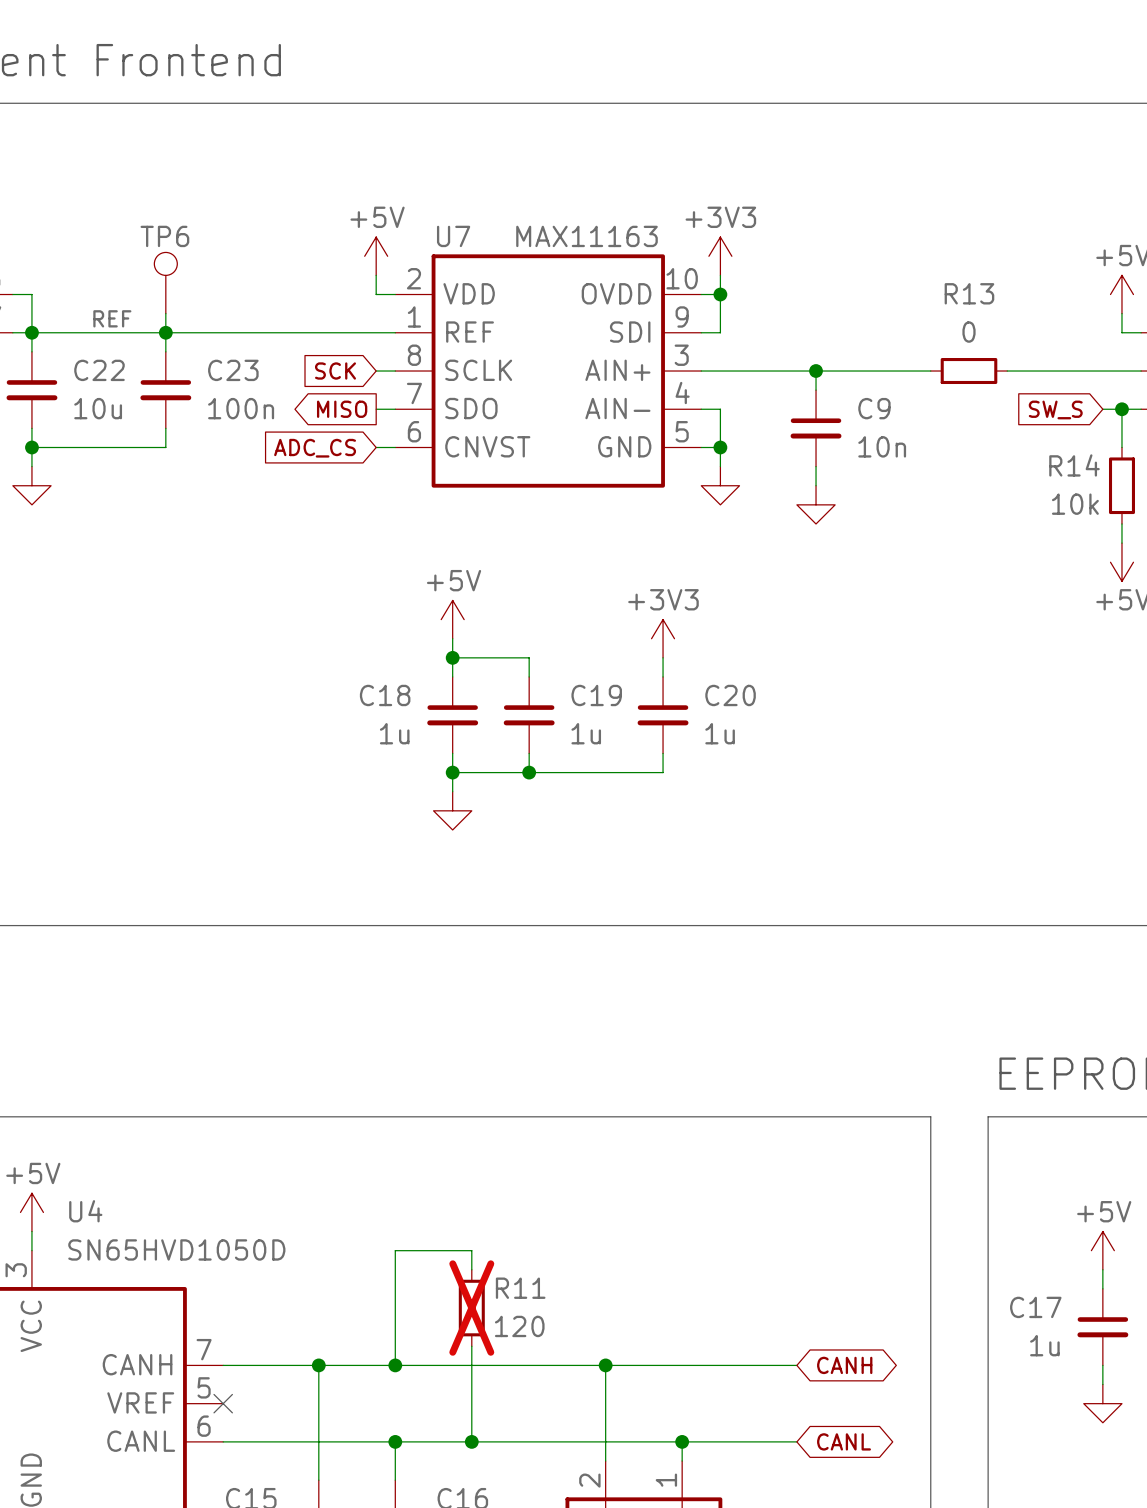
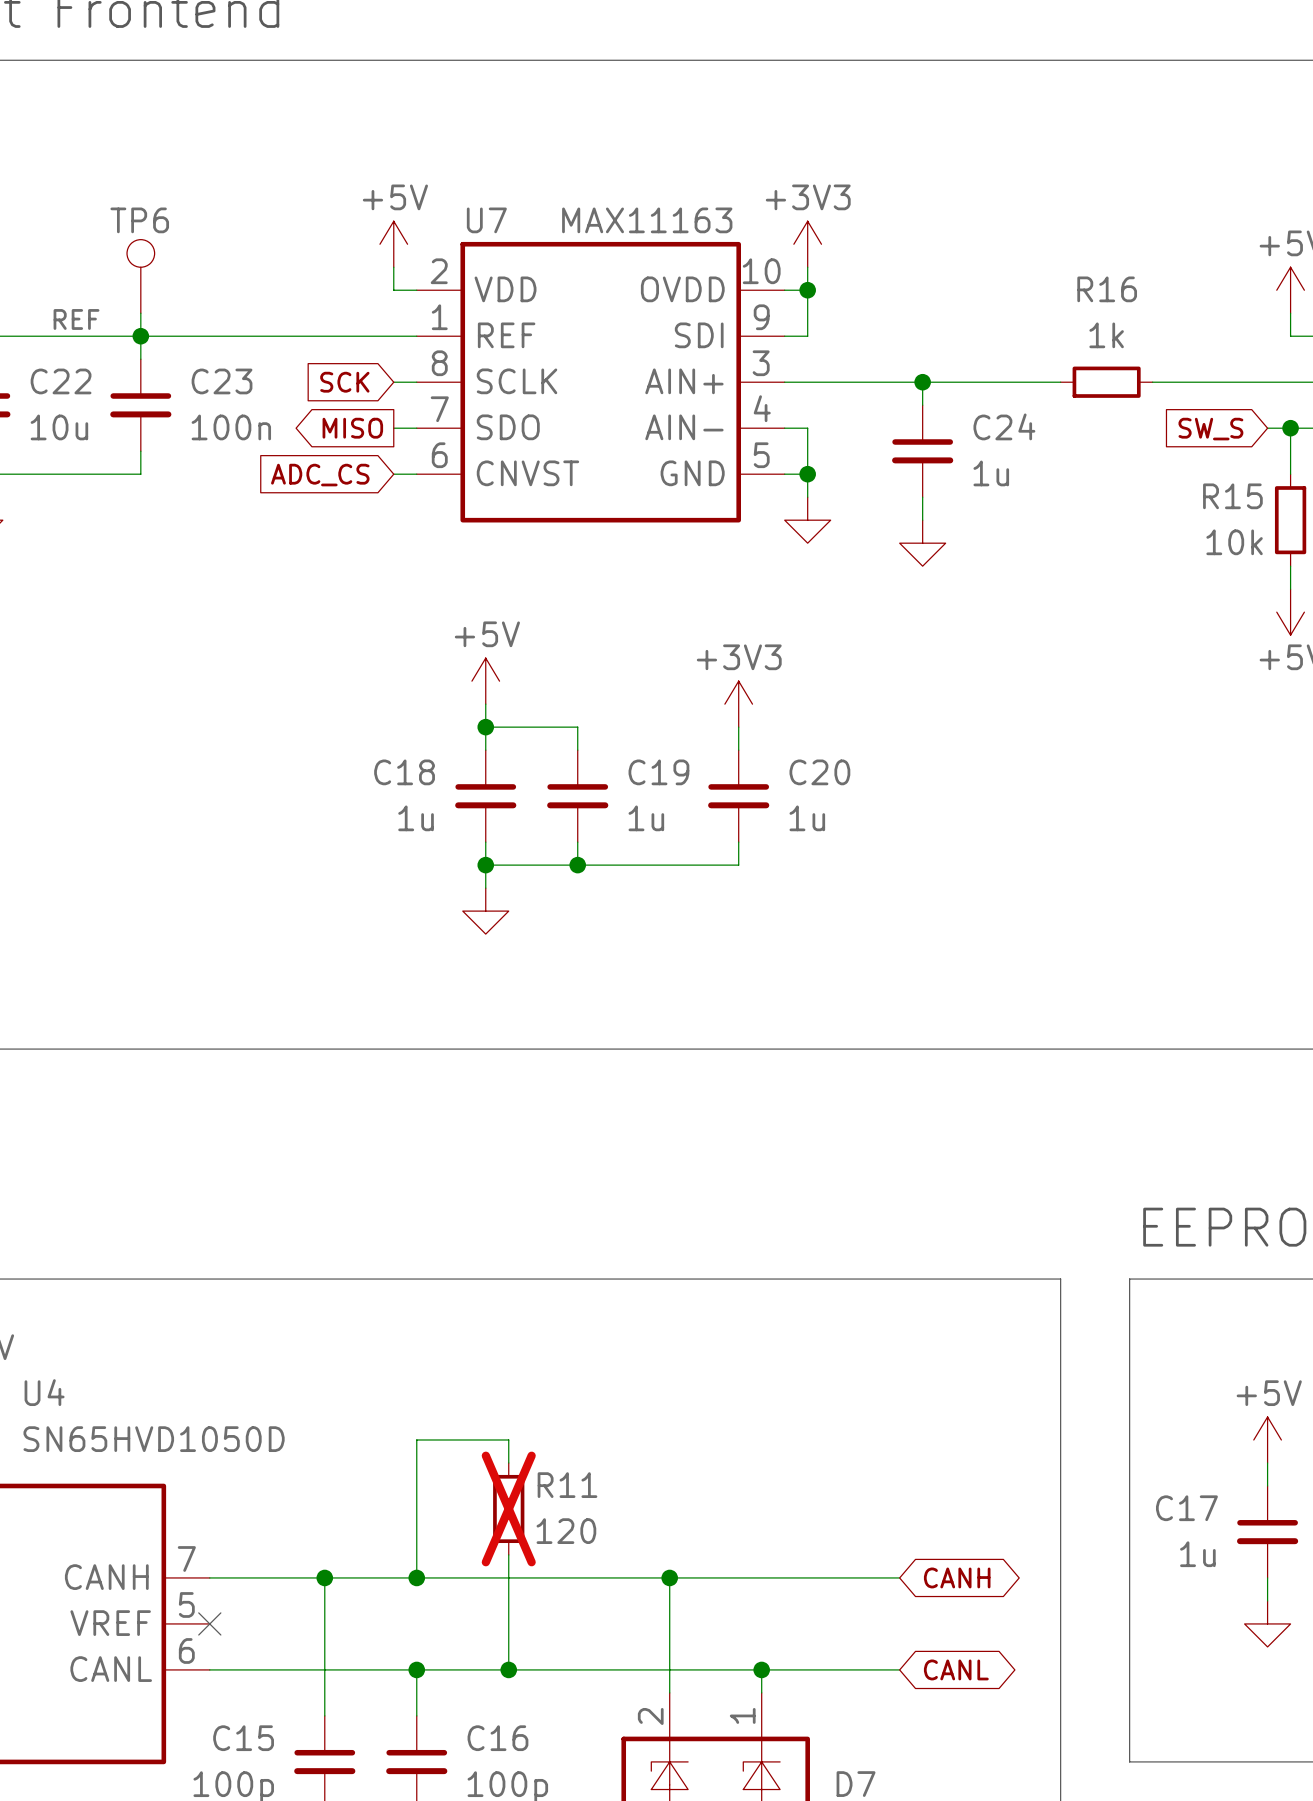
R13 name: R13 (969, 293) -> R16 (1107, 289)
R13 value: 0 (969, 332) -> 1k (1106, 335)
C9 name: C9 (874, 408) -> C24 (1004, 426)
C9 value: 10n (882, 446) -> 1u (991, 473)
R14 name: R14 (1074, 465) -> R15 (1232, 496)

